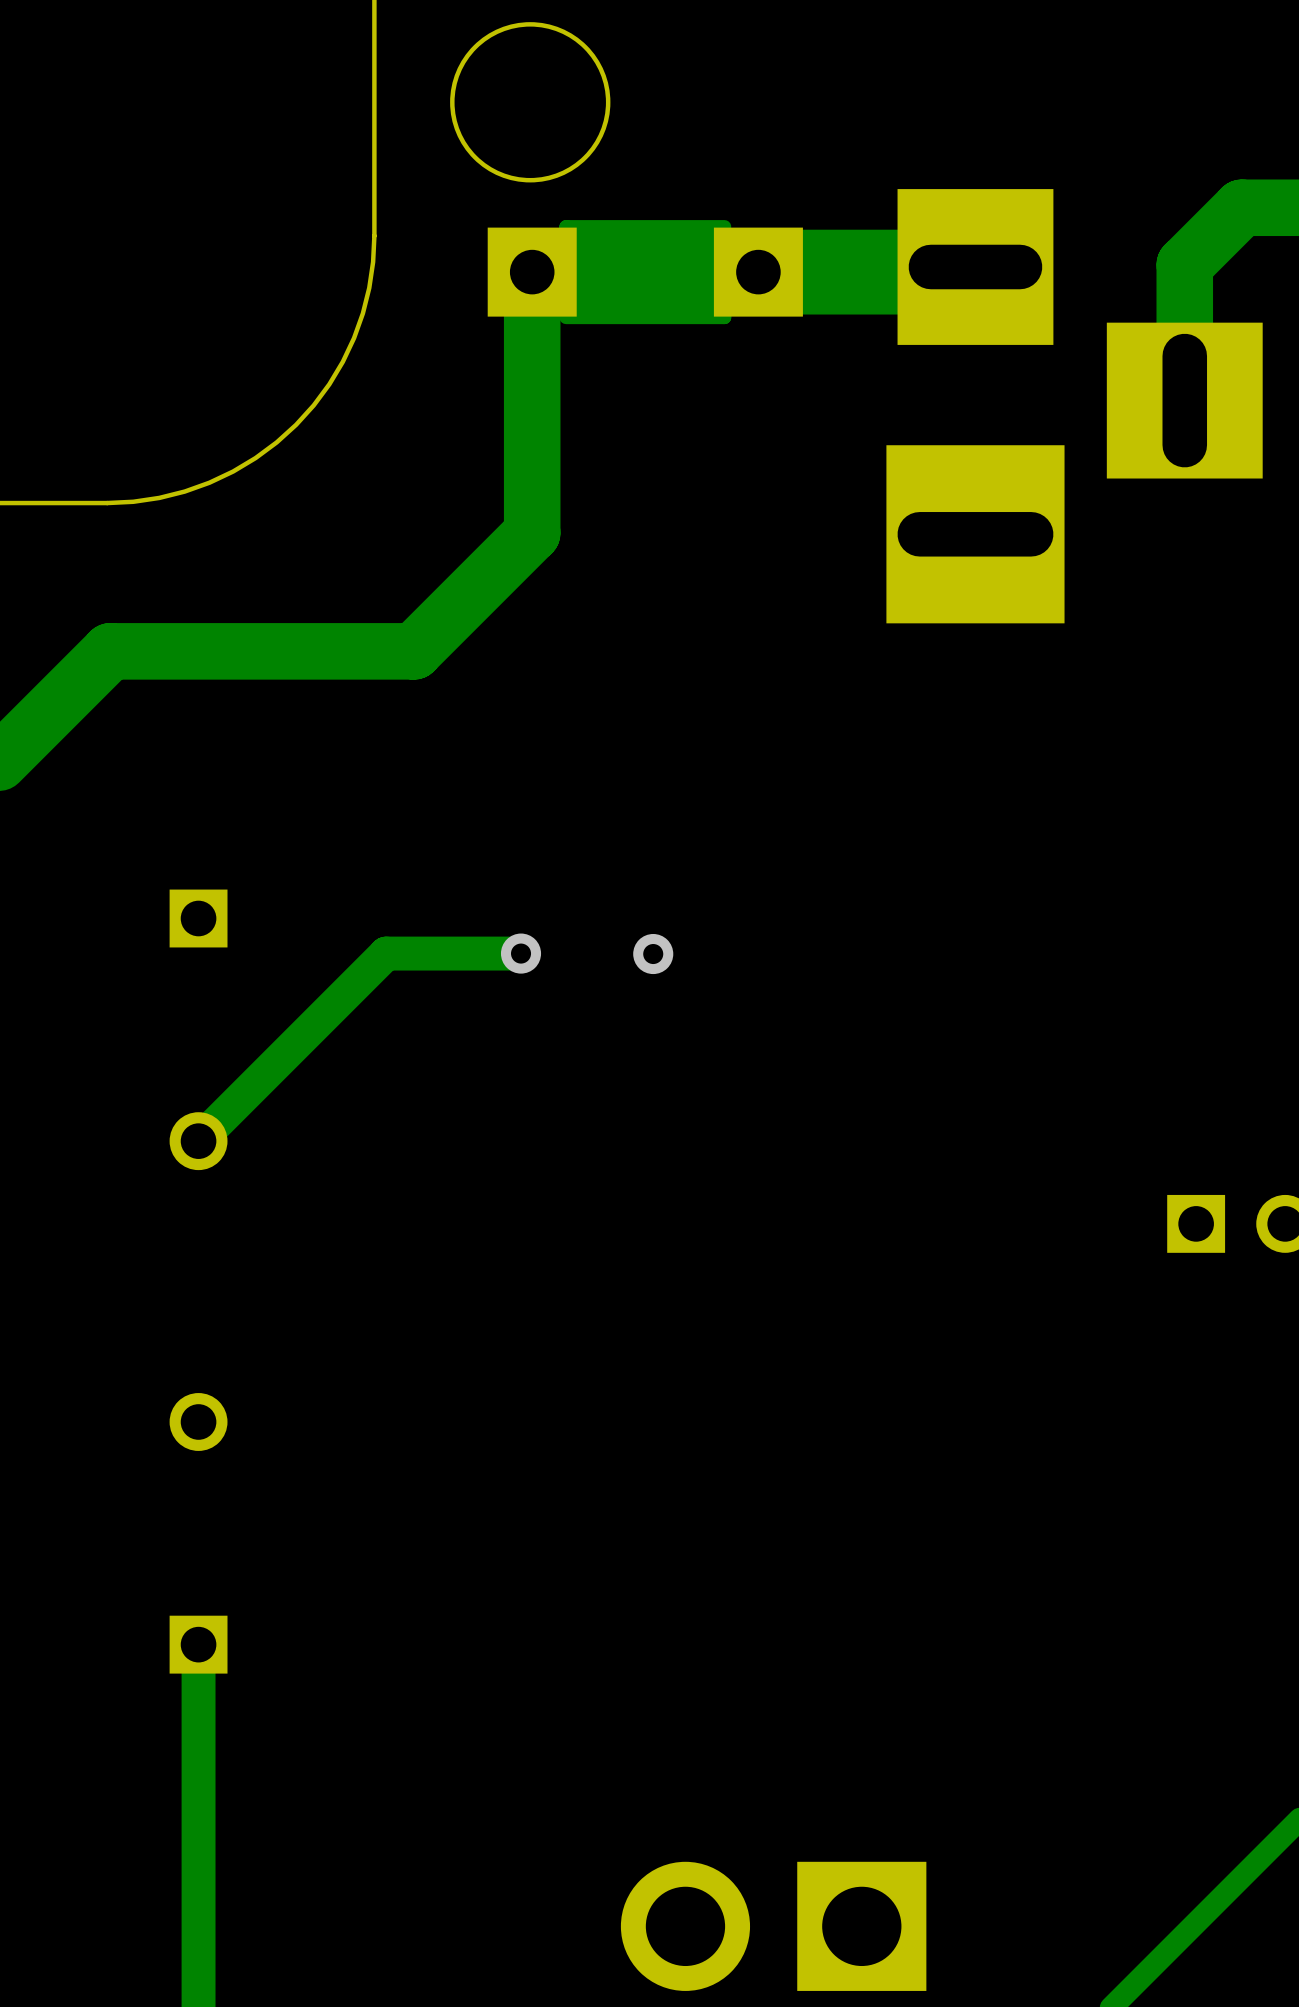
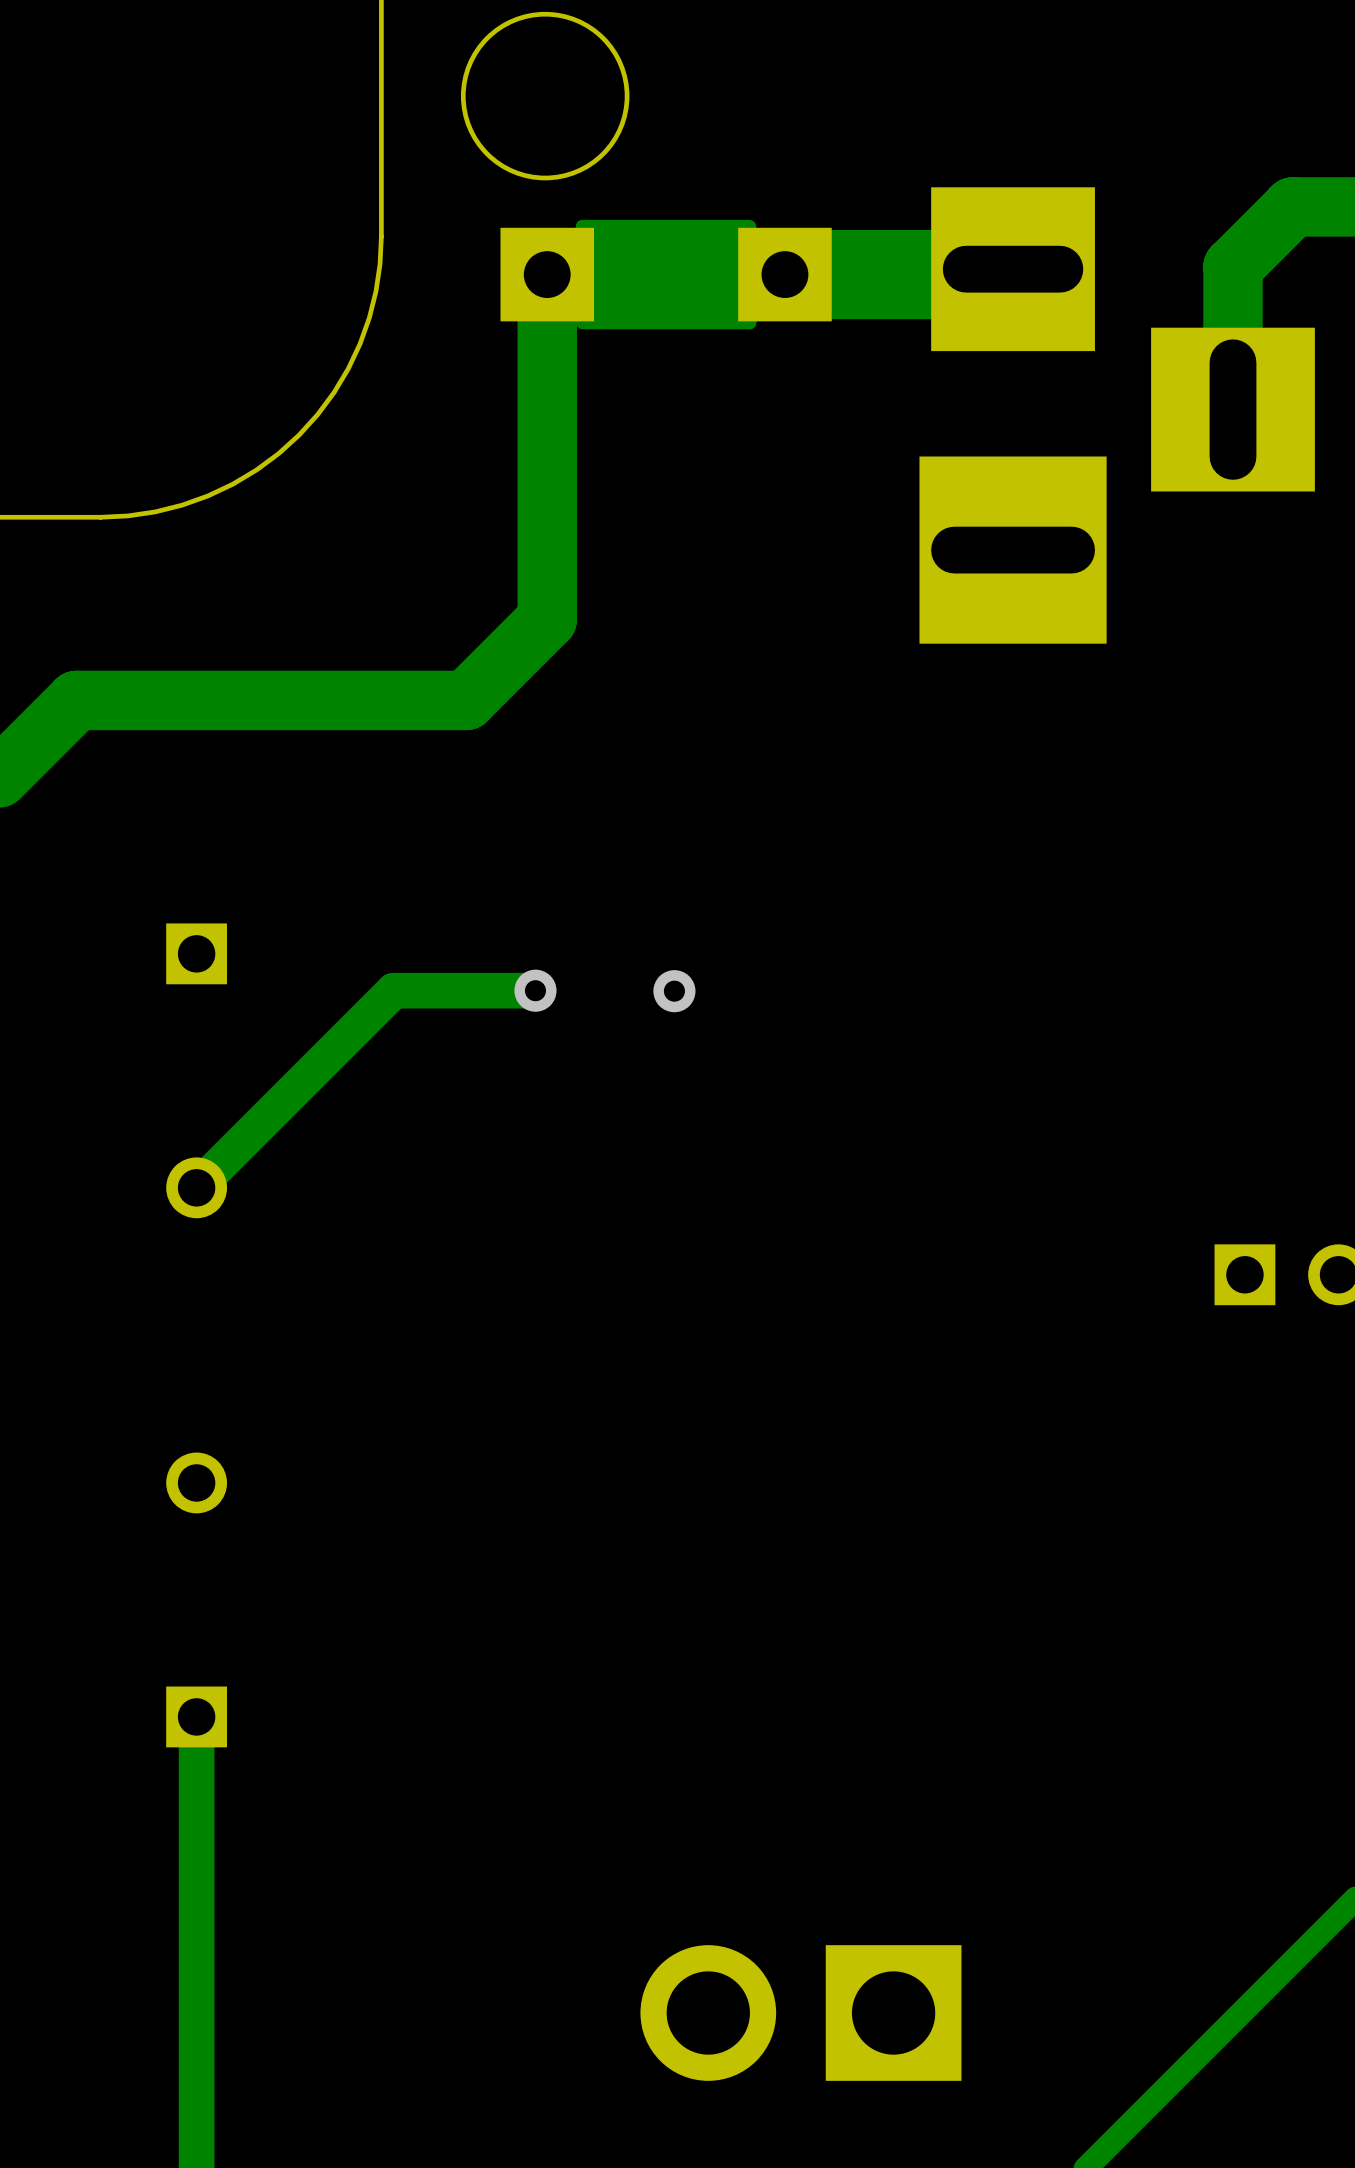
track: (532, 533) (413, 651) (110, 651) (84, 677) -> (547, 548) (547, 619) (466, 700) (76, 700)

